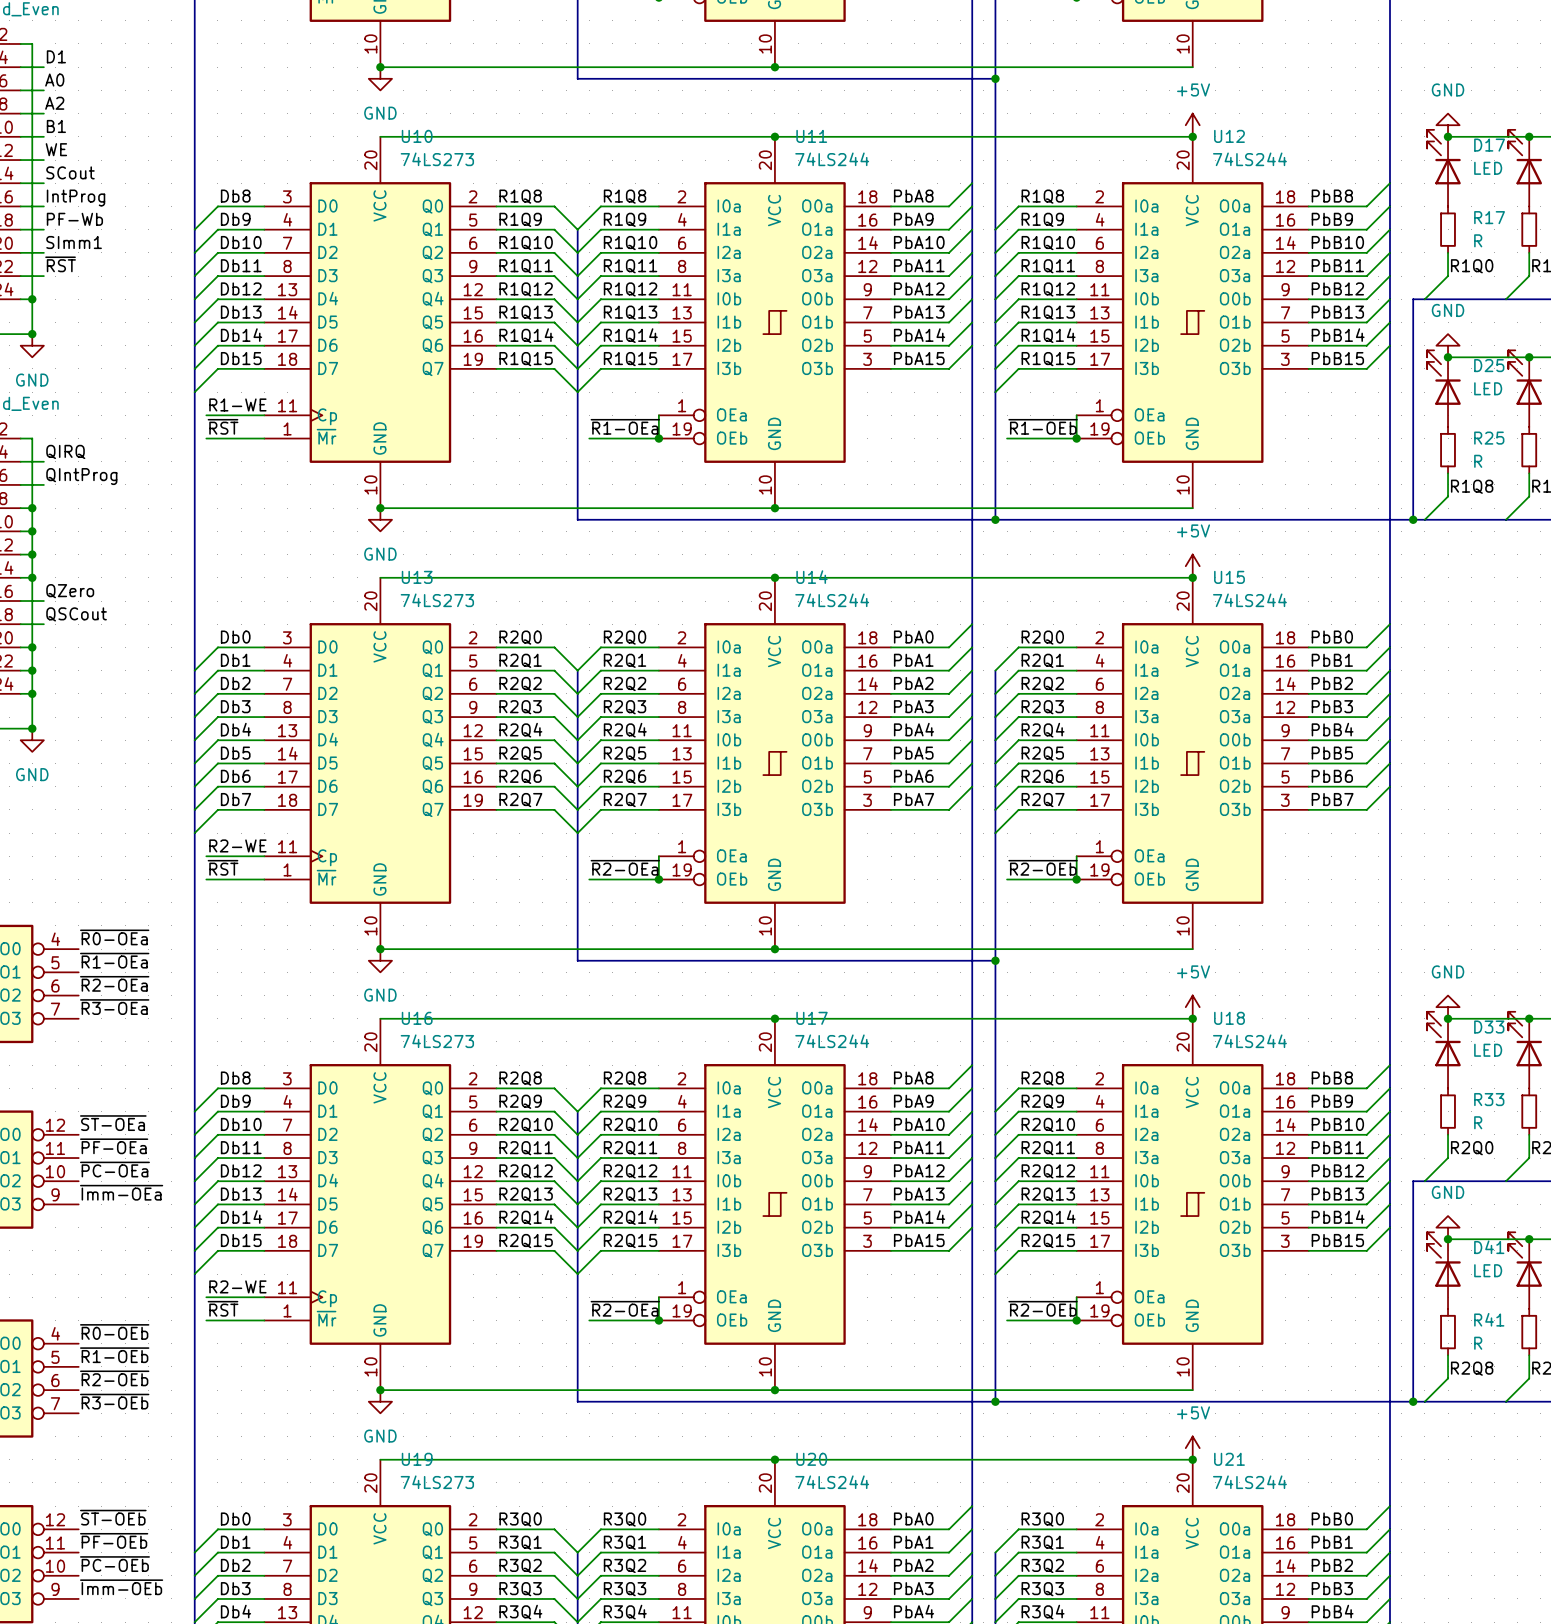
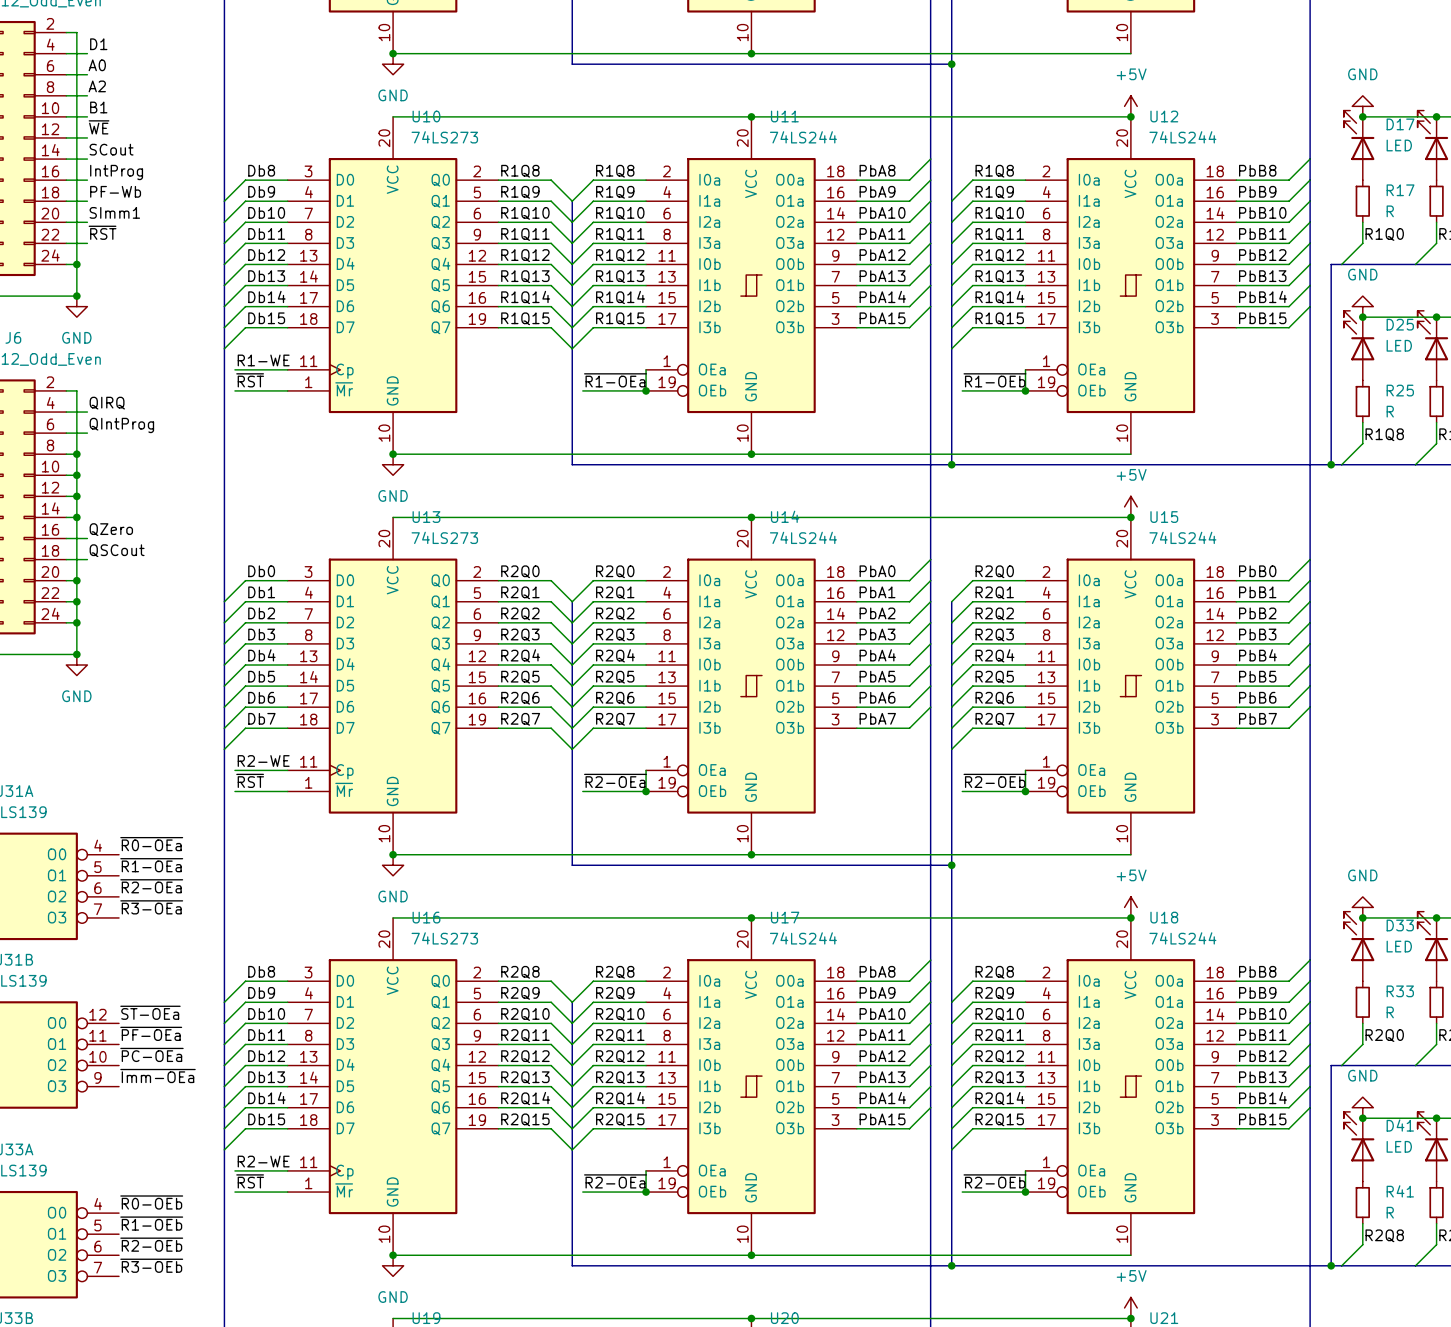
label: WE (56, 149) -> ~{WE} (99, 127)

